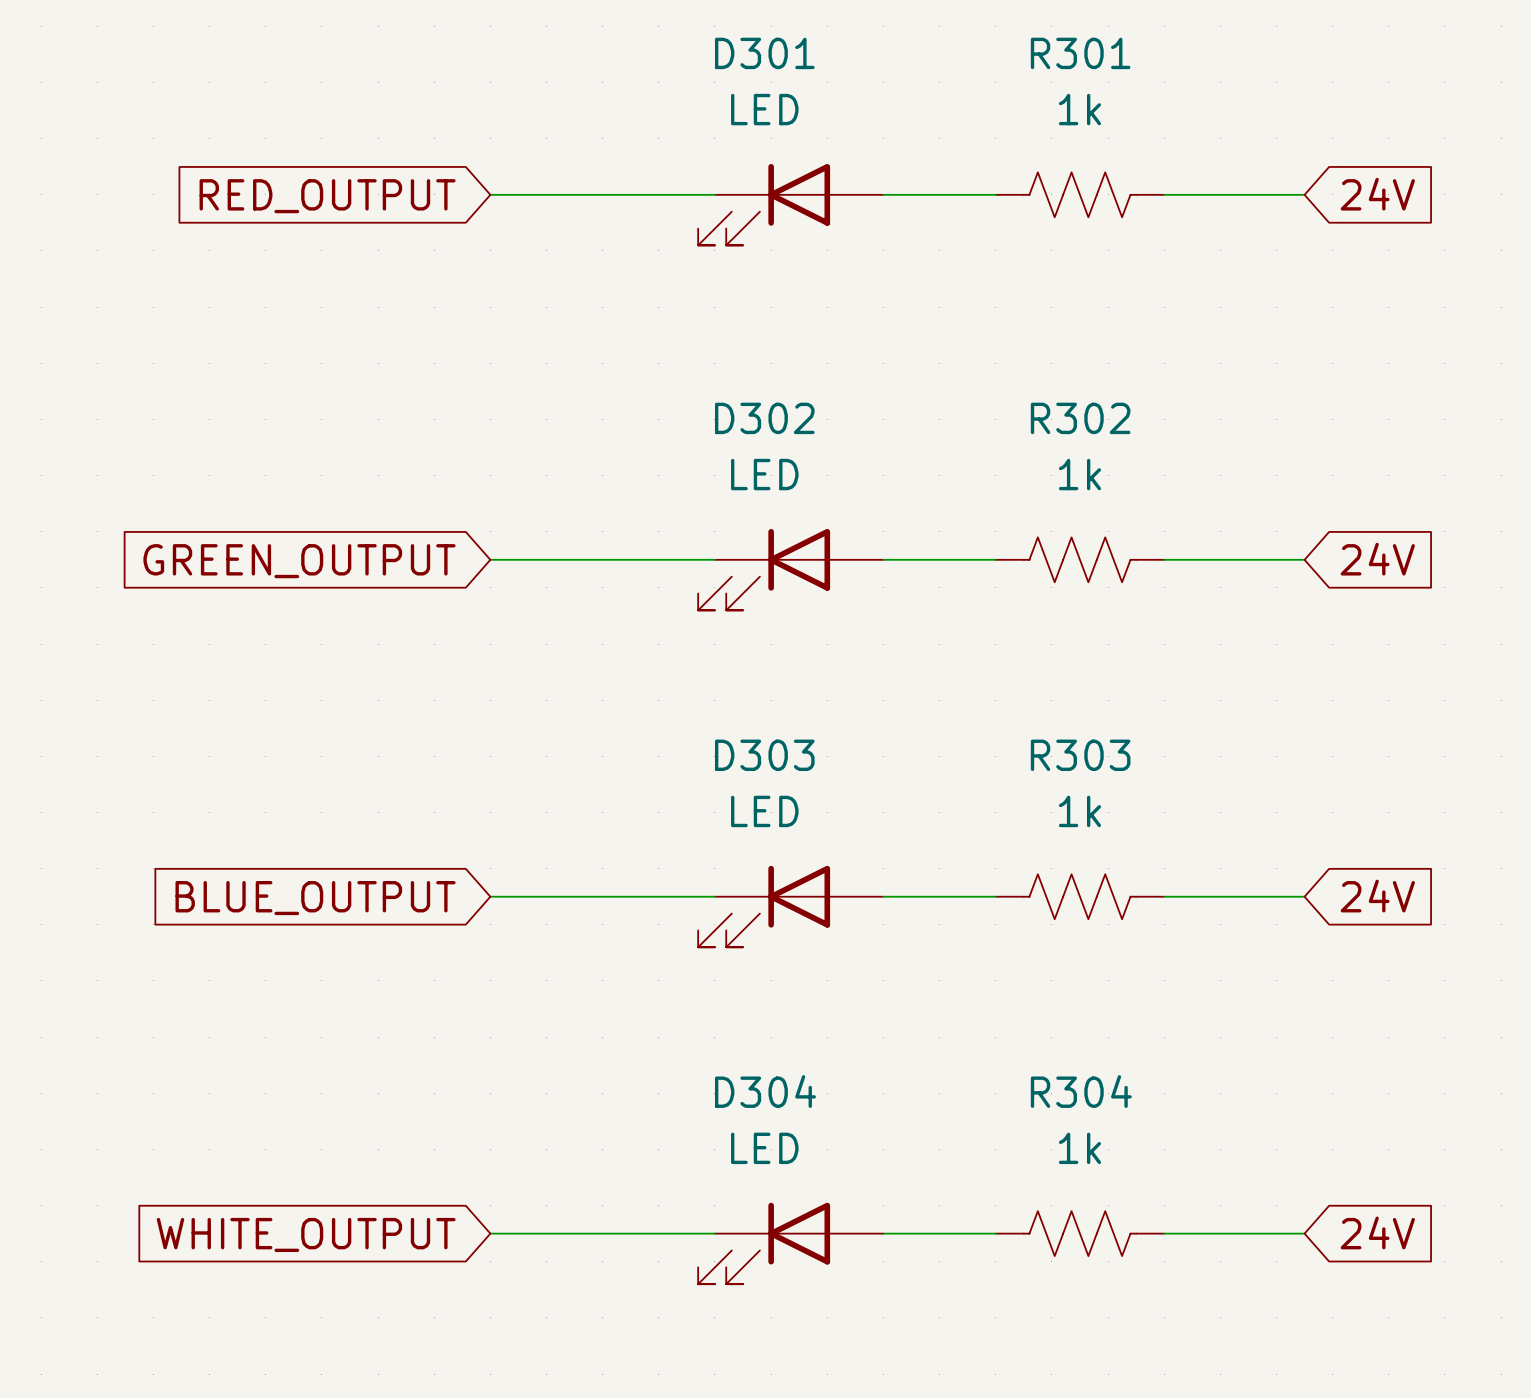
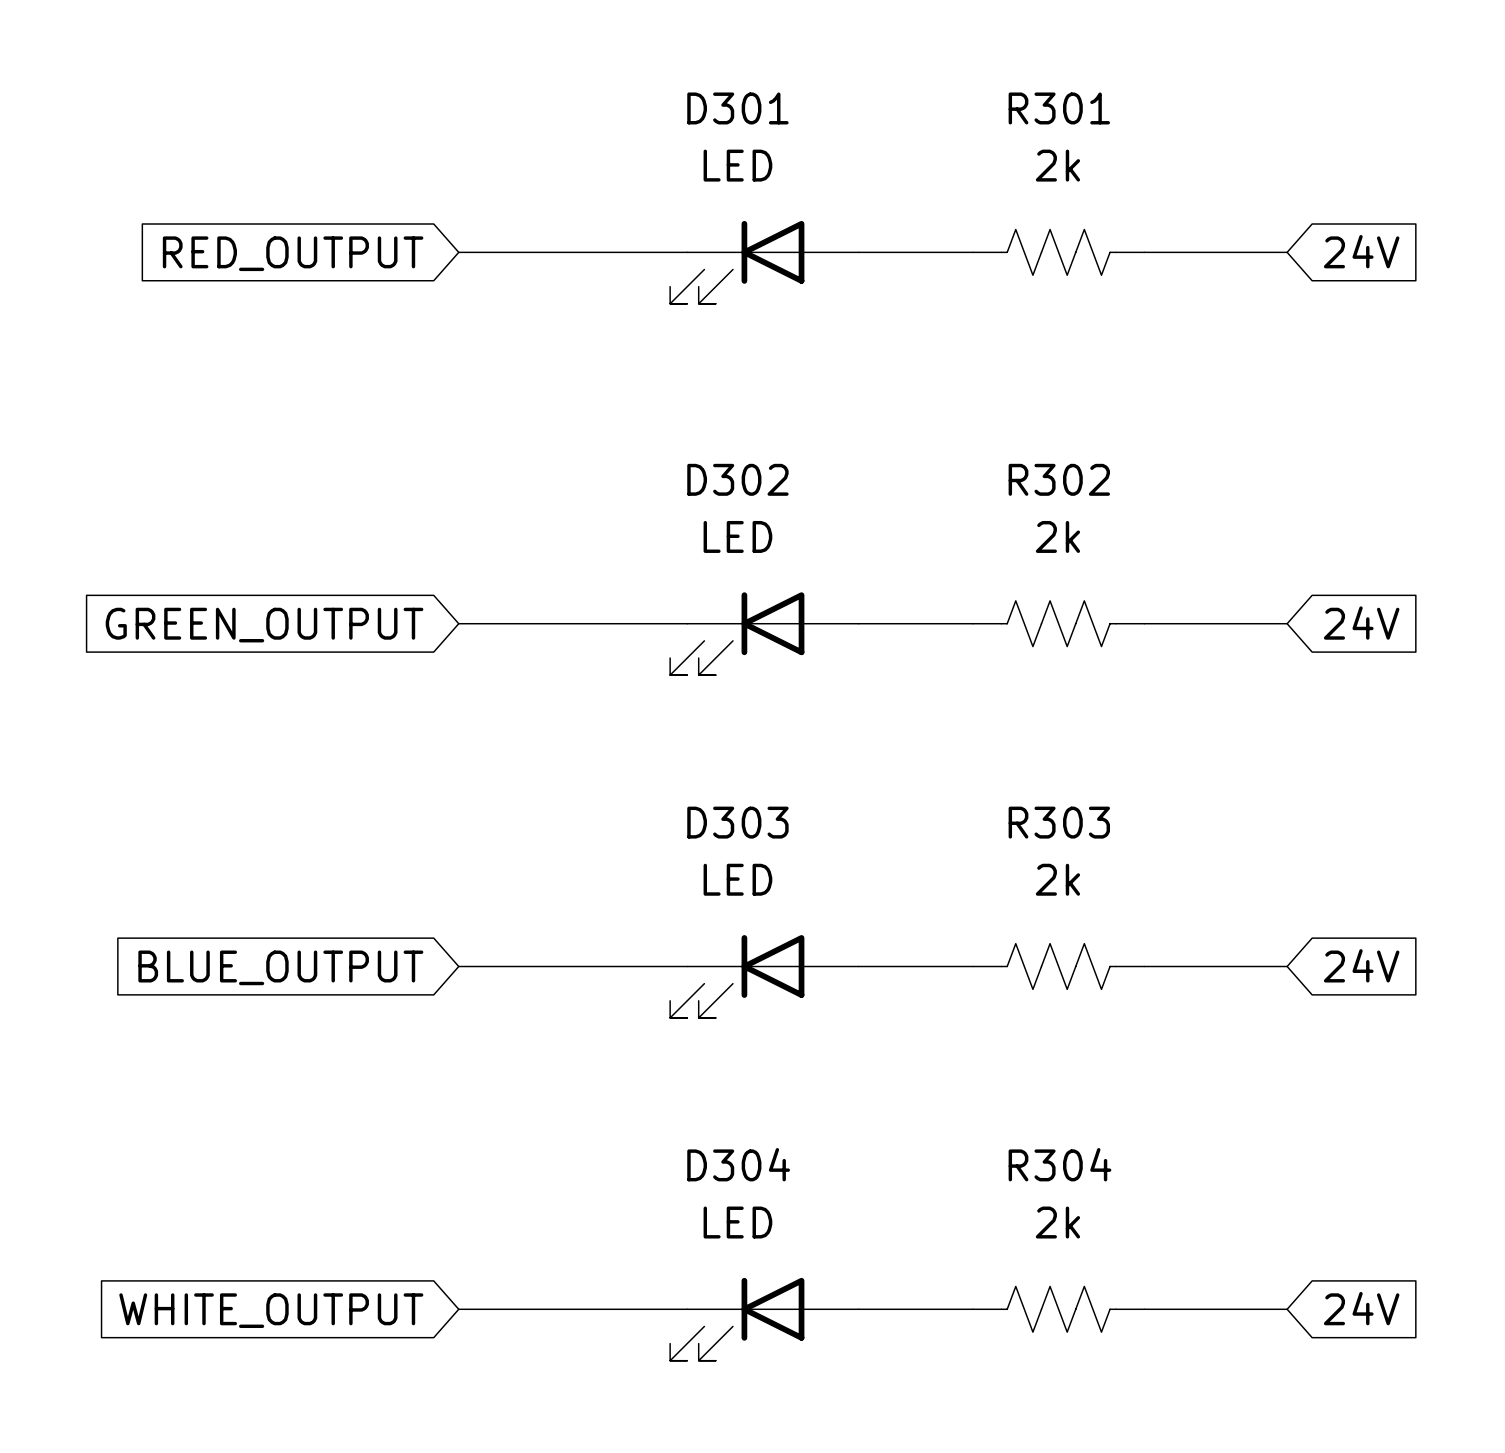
R301 value: 1k (1079, 109) -> 2k (1057, 165)
R302 value: 1k (1079, 474) -> 2k (1057, 536)
R303 value: 1k (1079, 811) -> 2k (1057, 879)
R304 value: 1k (1079, 1148) -> 2k (1057, 1222)

